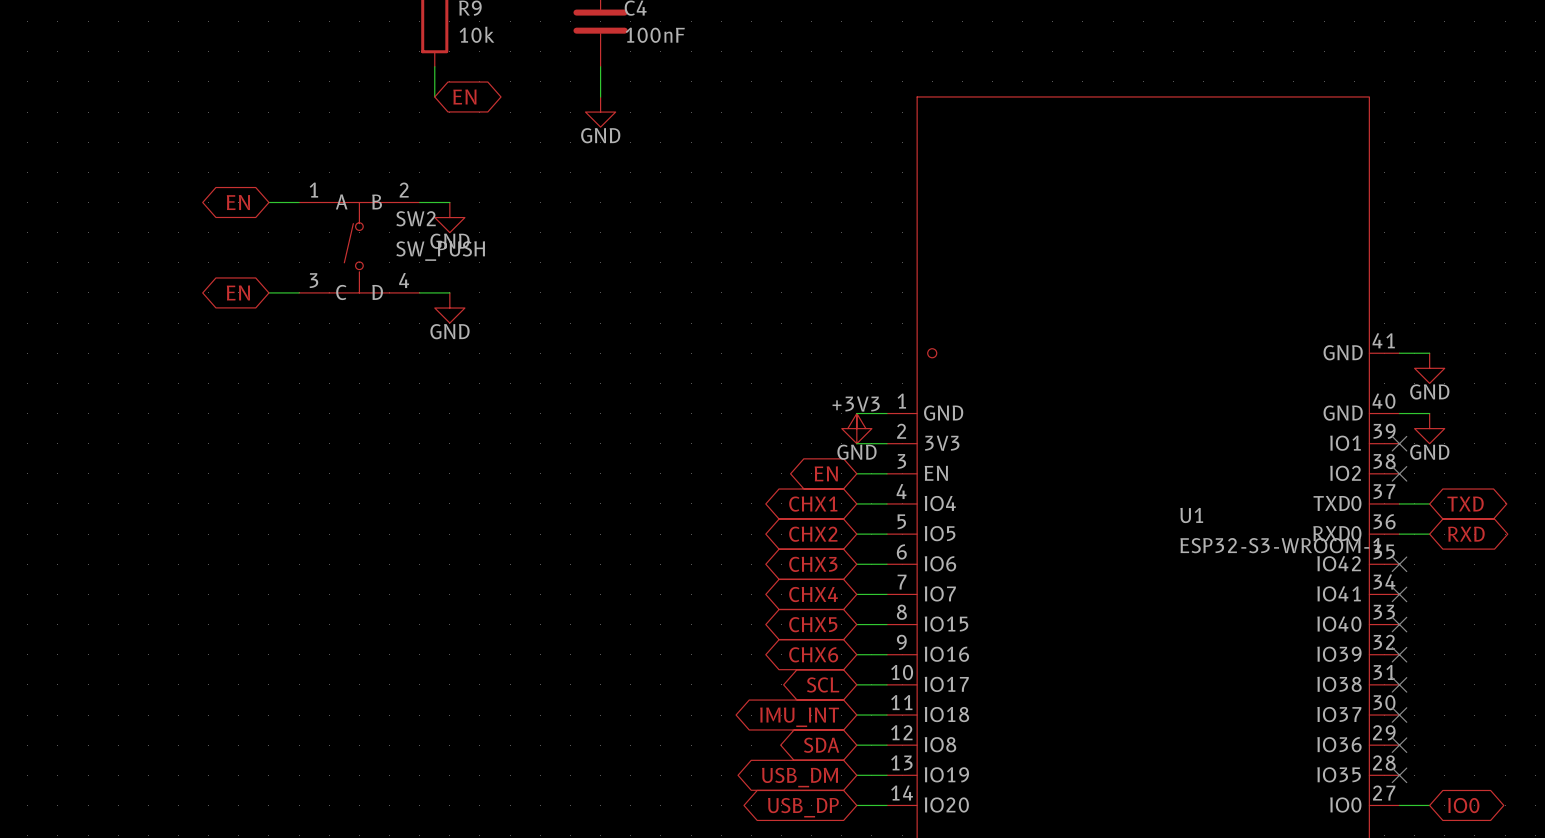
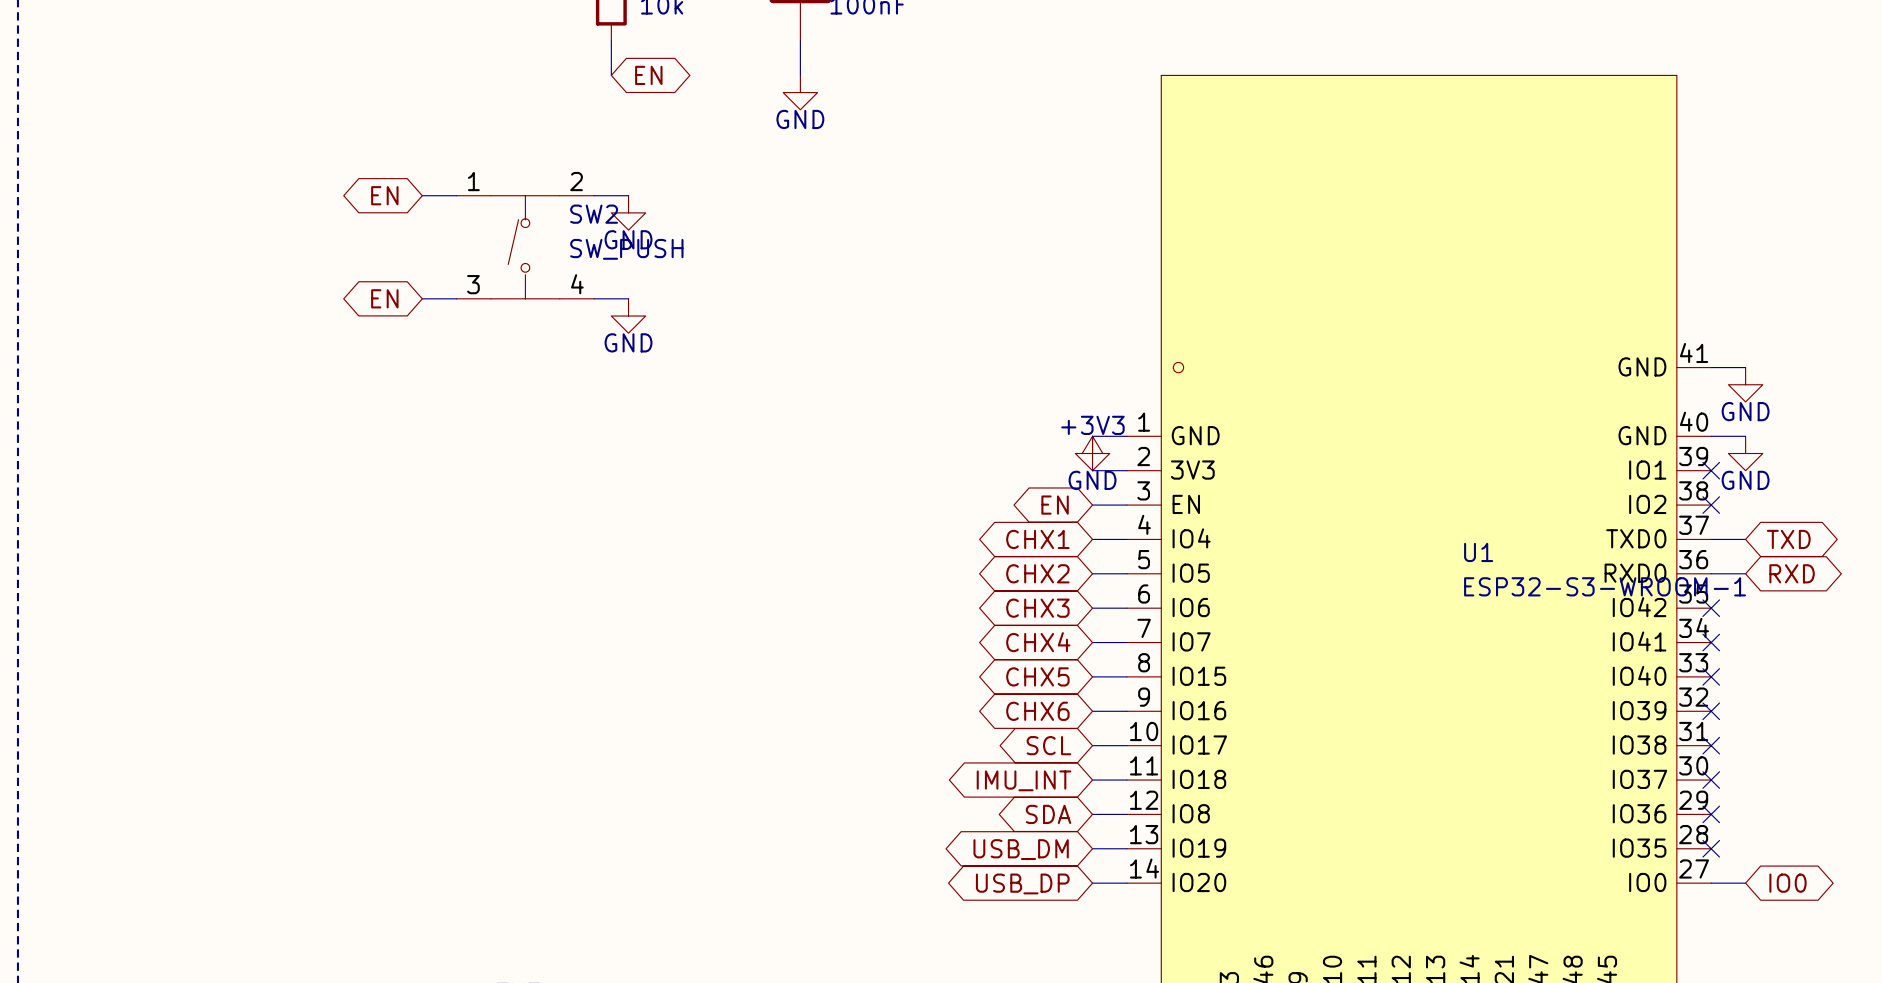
SW2 pin name: A (341, 201) -> none
SW2 pin name: B (377, 201) -> none
SW2 pin name: C (341, 292) -> none
SW2 pin name: D (377, 292) -> none

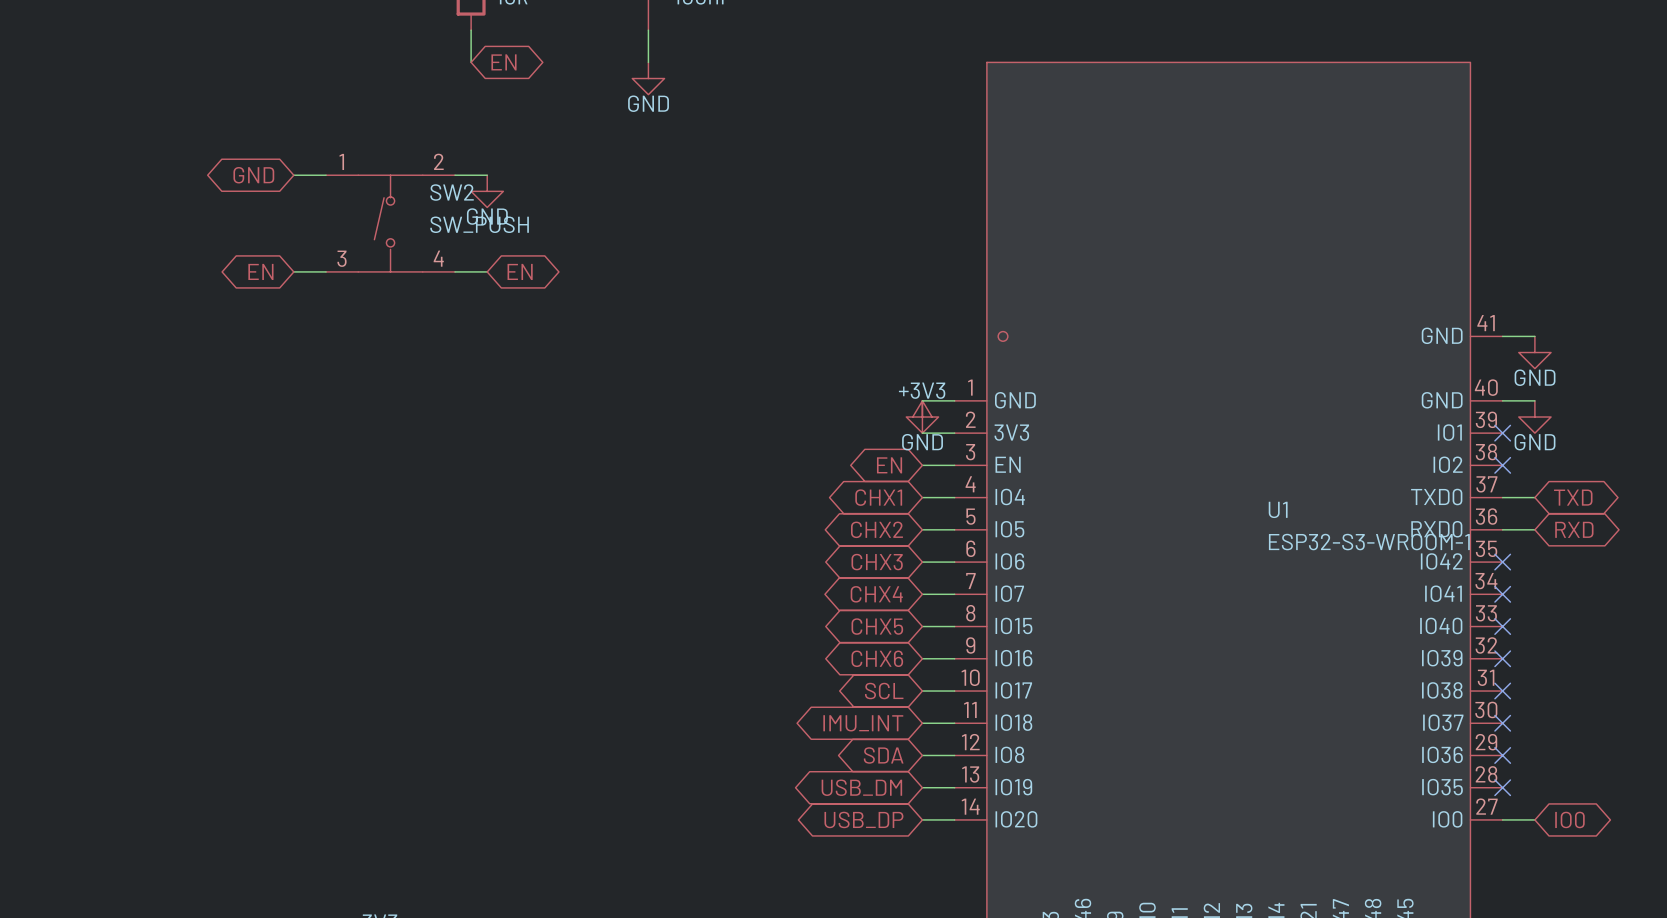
global label: EN (384, 195) -> GND (253, 175)
global label: none -> EN (520, 271)
power symbol: GND (628, 316) -> none

